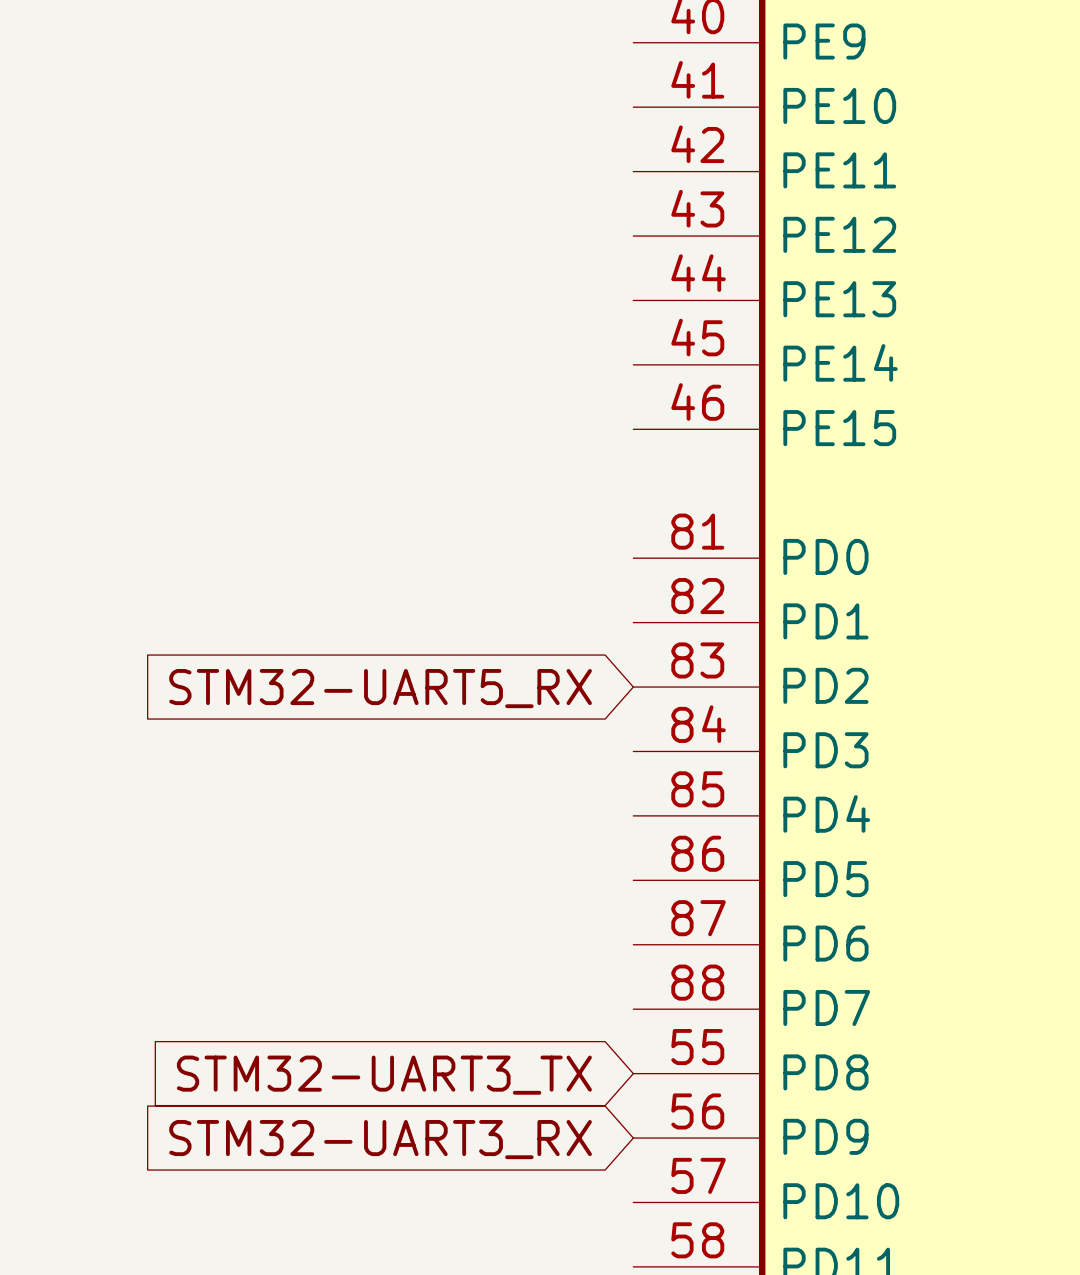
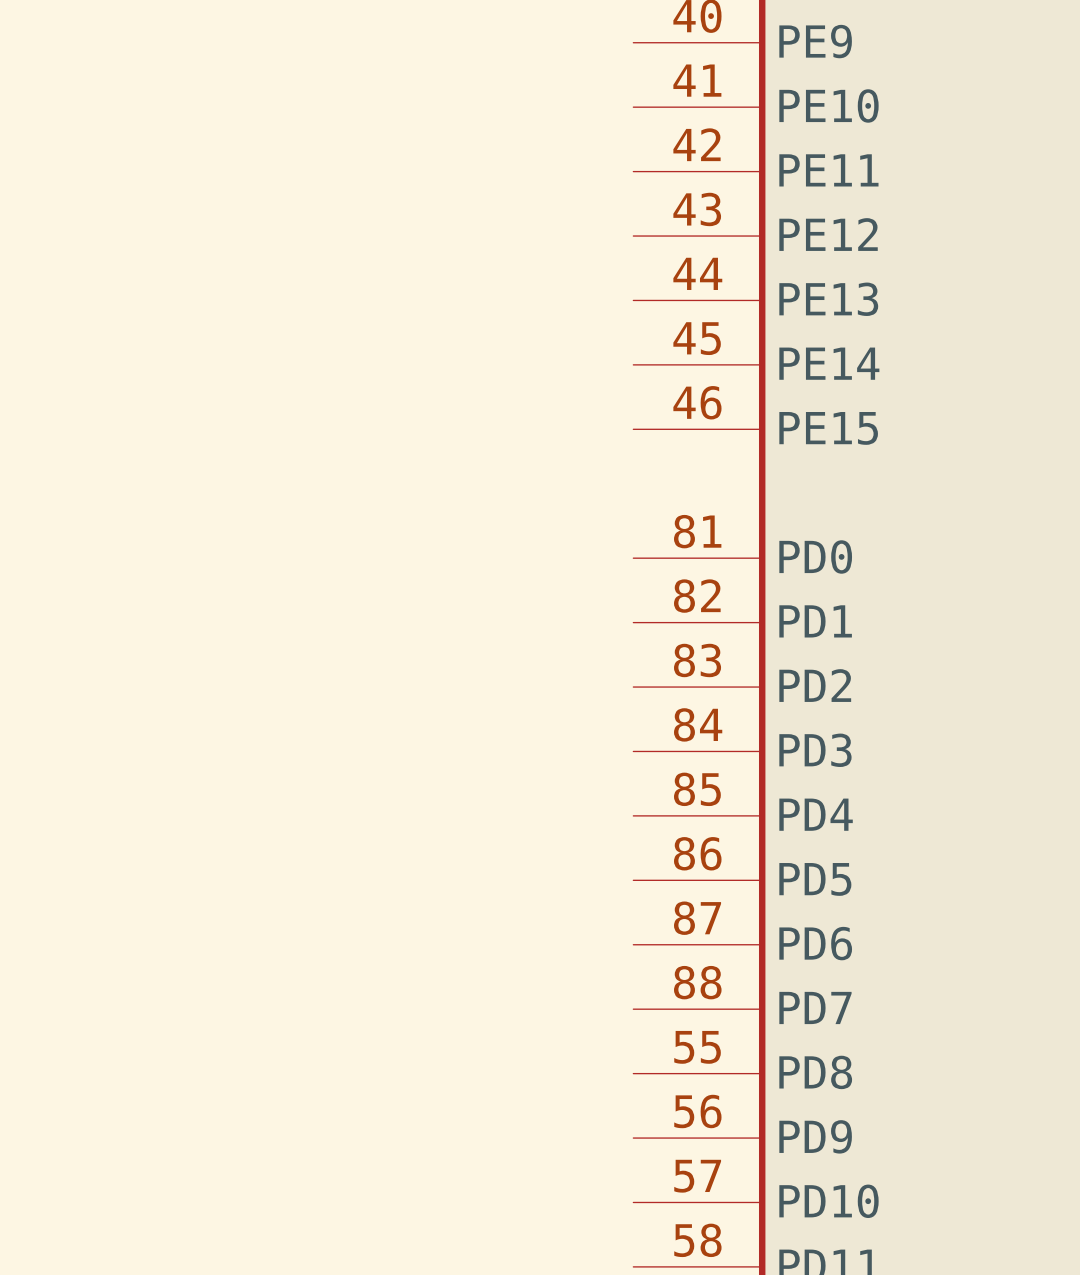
global label: STM32-UART5_RX (380, 688) -> none
global label: STM32-UART3_TX (384, 1075) -> none
global label: STM32-UART3_RX (380, 1139) -> none

